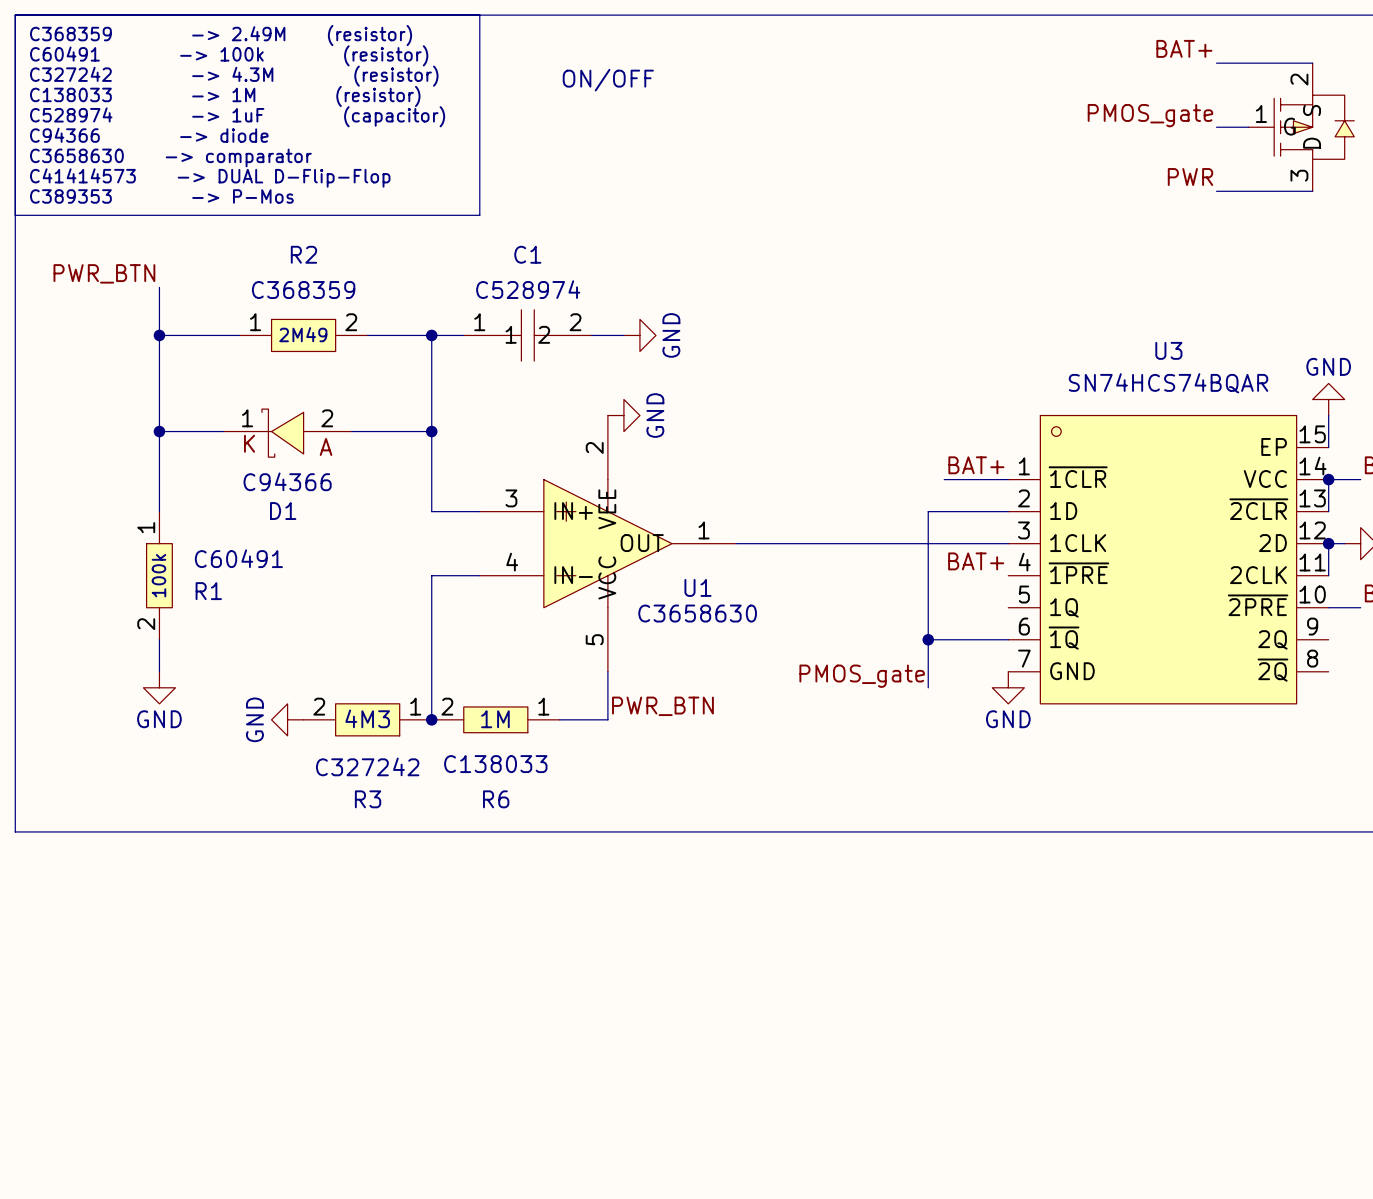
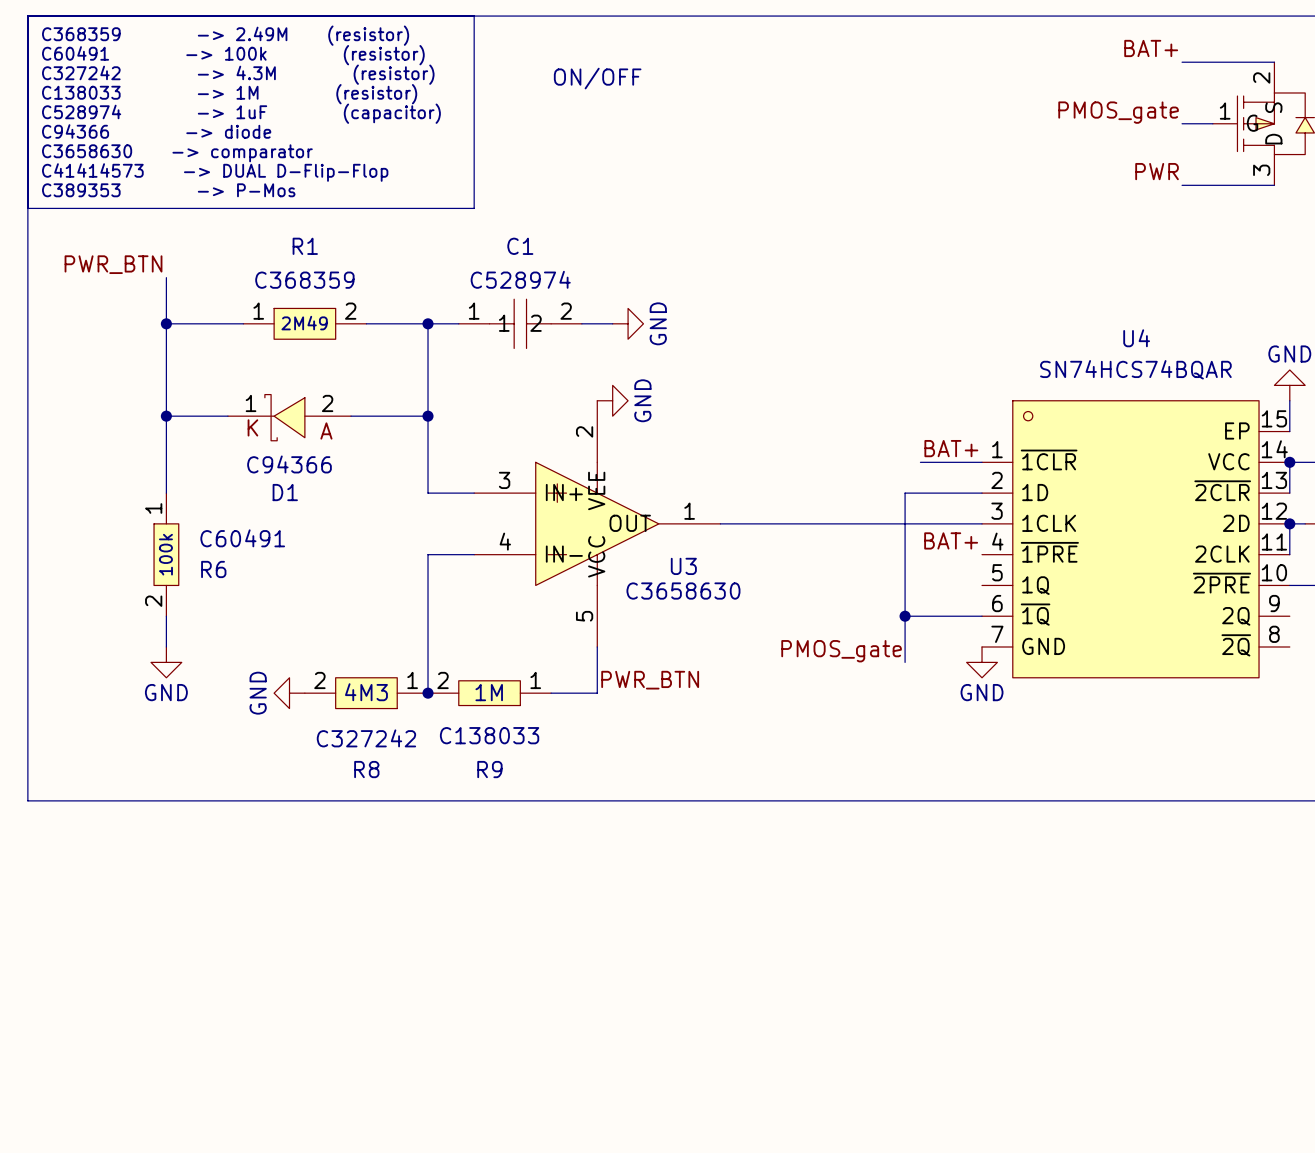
R2 name: R2 (303, 254) -> R1 (305, 246)
U3 name: U3 (1168, 350) -> U4 (1136, 338)
U1 name: U1 (697, 587) -> U3 (683, 566)
R1 name: R1 (208, 591) -> R6 (213, 569)
R3 name: R3 (368, 799) -> R8 (366, 769)
R6 name: R6 (496, 799) -> R9 (489, 769)

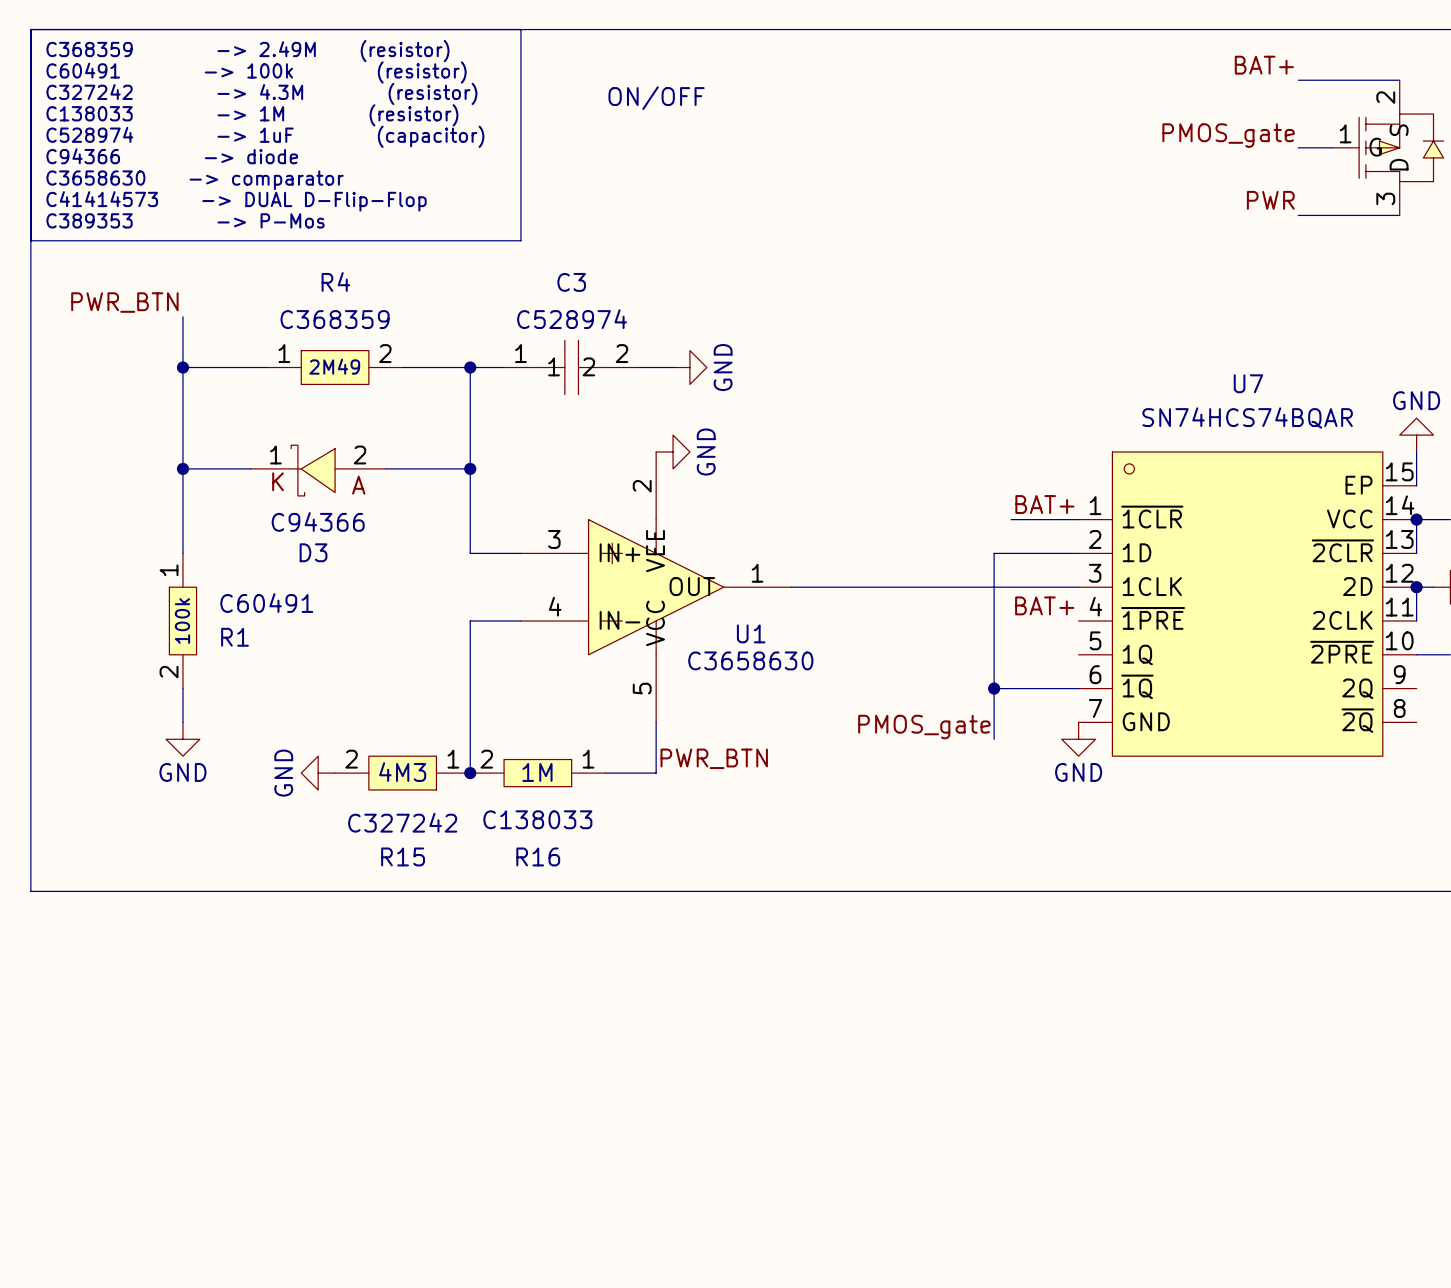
R1 name: R1 (305, 246) -> R4 (335, 281)
C1 name: C1 (520, 246) -> C3 (571, 282)
U4 name: U4 (1136, 338) -> U7 (1248, 383)
D1 name: D1 (285, 492) -> D3 (313, 552)
U3 name: U3 (683, 566) -> U1 (751, 633)
R6 name: R6 (213, 569) -> R1 (235, 637)
R8 name: R8 (366, 769) -> R15 (403, 856)
R9 name: R9 (489, 769) -> R16 (538, 856)

